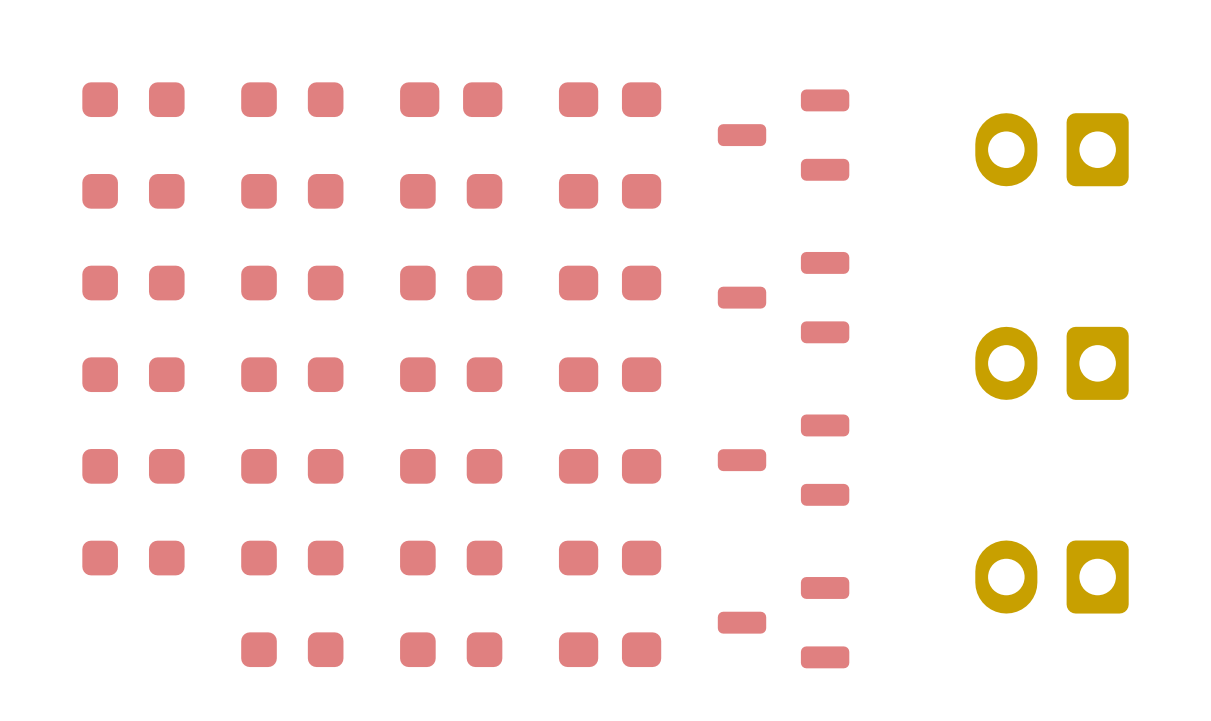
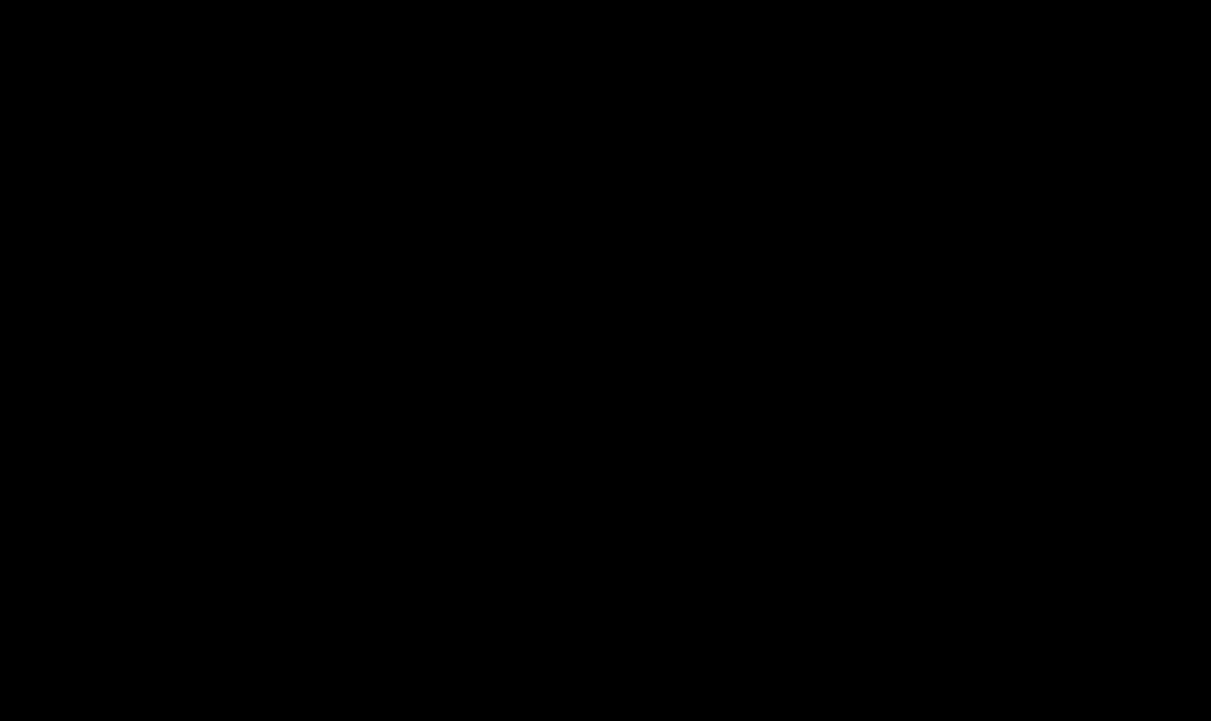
part: (133, 99) -> none
part: (292, 99) -> none
part: (451, 99) -> none
part: (610, 99) -> none
part: (783, 135) -> none
part: (1051, 149) -> none
part: (133, 191) -> none
part: (292, 191) -> none
part: (451, 191) -> none
part: (610, 191) -> none
part: (133, 283) -> none
part: (292, 283) -> none
part: (451, 283) -> none
part: (610, 283) -> none
part: (783, 297) -> none
part: (1051, 363) -> none
part: (133, 374) -> none
part: (292, 374) -> none
part: (451, 374) -> none
part: (610, 374) -> none
part: (783, 460) -> none
part: (133, 466) -> none
part: (292, 466) -> none
part: (451, 466) -> none
part: (610, 466) -> none
part: (133, 558) -> none
part: (292, 558) -> none
part: (451, 558) -> none
part: (610, 558) -> none
part: (1051, 577) -> none
part: (783, 622) -> none
part: (292, 649) -> none
part: (451, 649) -> none
part: (610, 649) -> none

